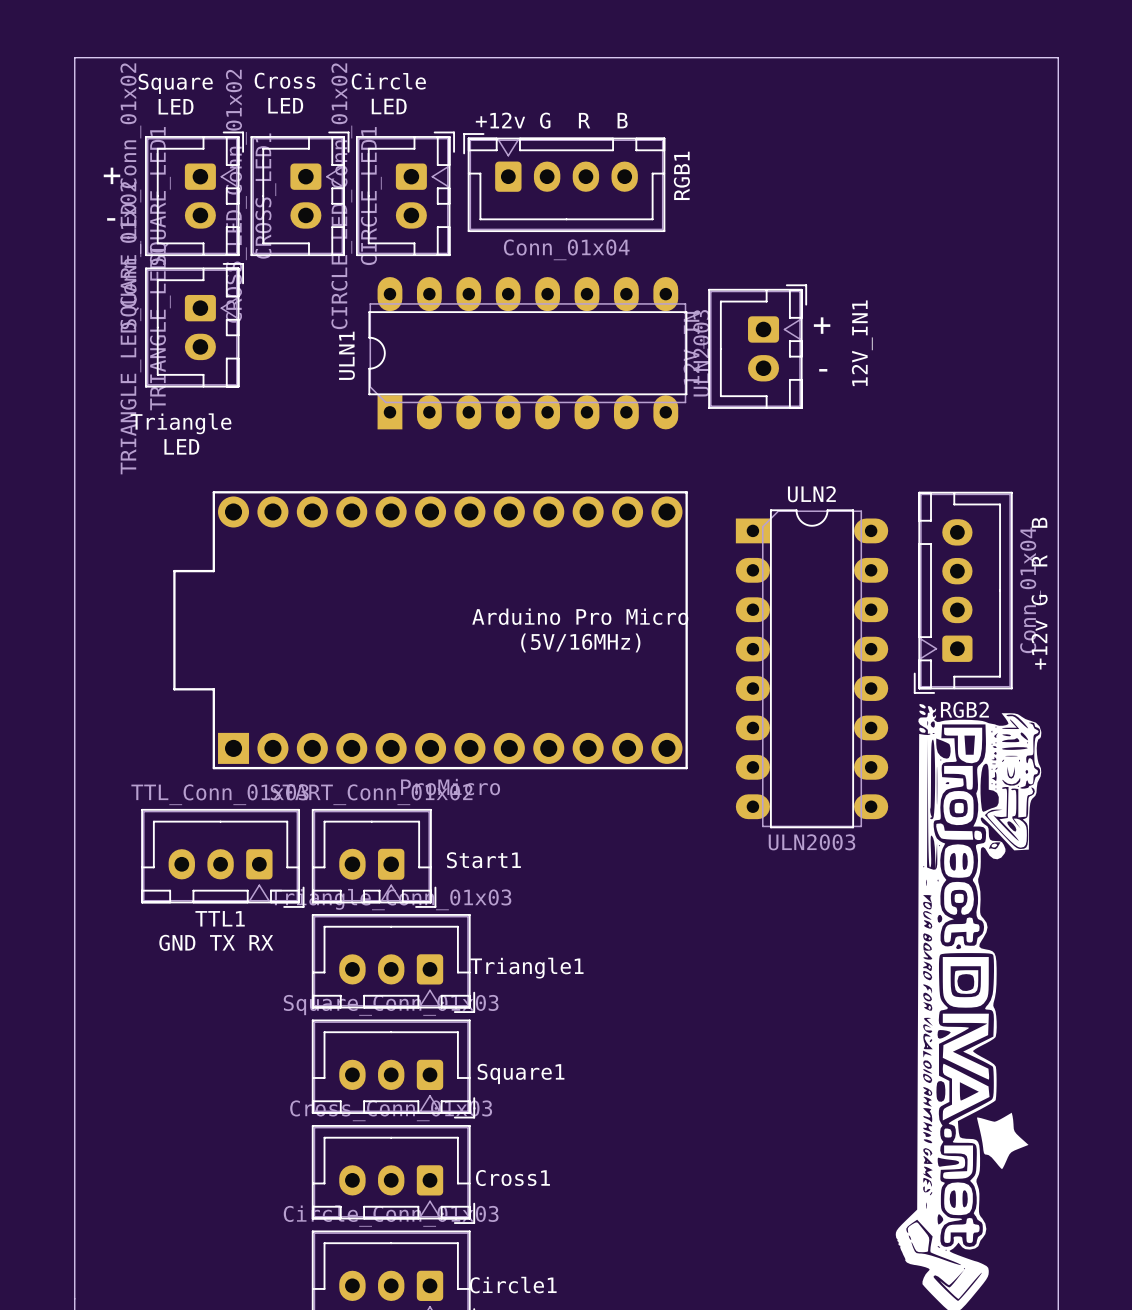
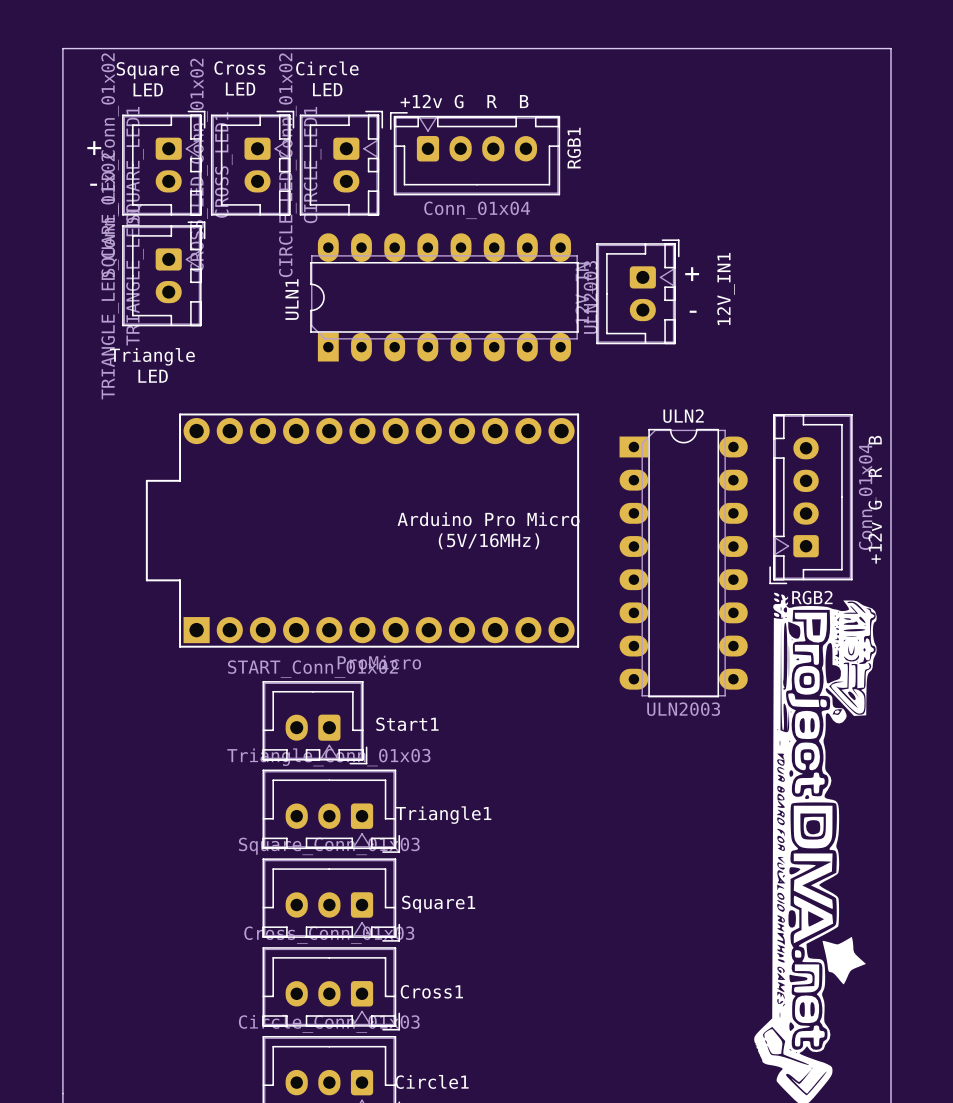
TTL1: TTL_Conn_01x03 (222, 858) -> none
text: GND TX RX (216, 942) -> none

